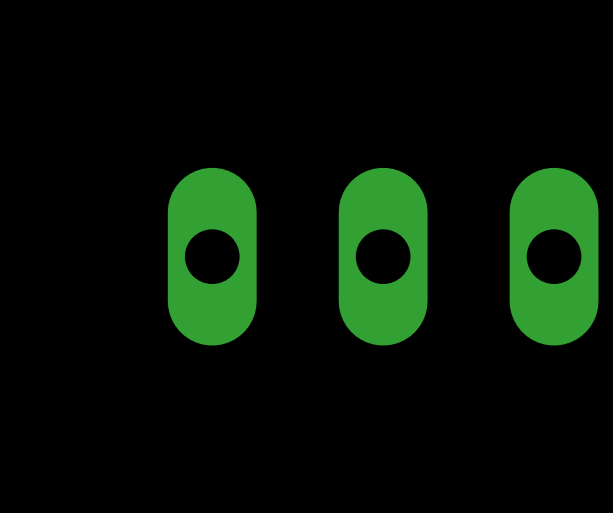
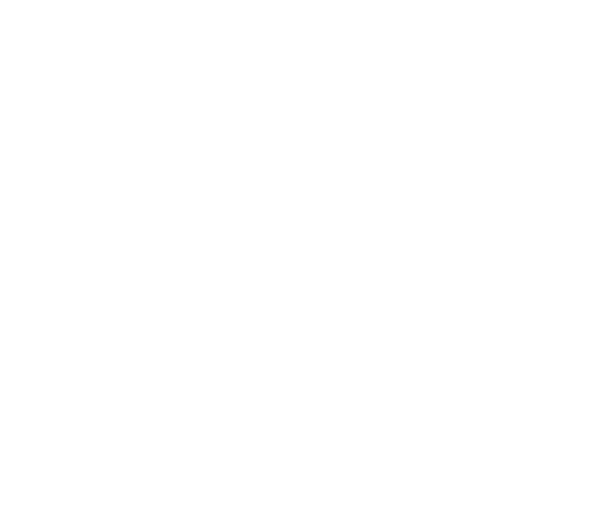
part: (383, 256) -> none

